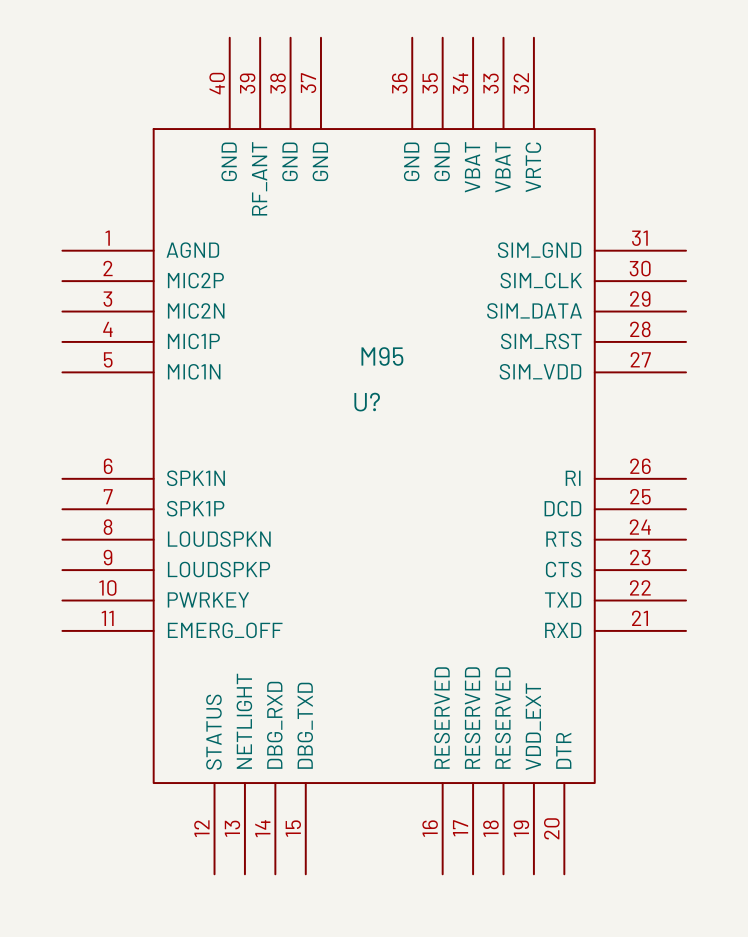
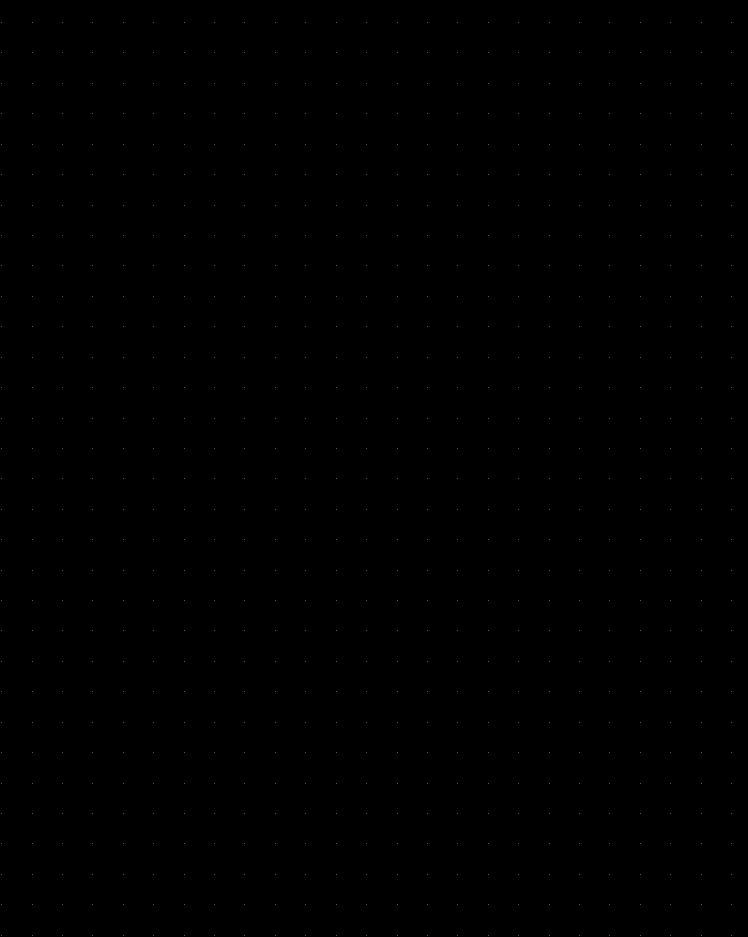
U?: M95 (374, 456) -> none

